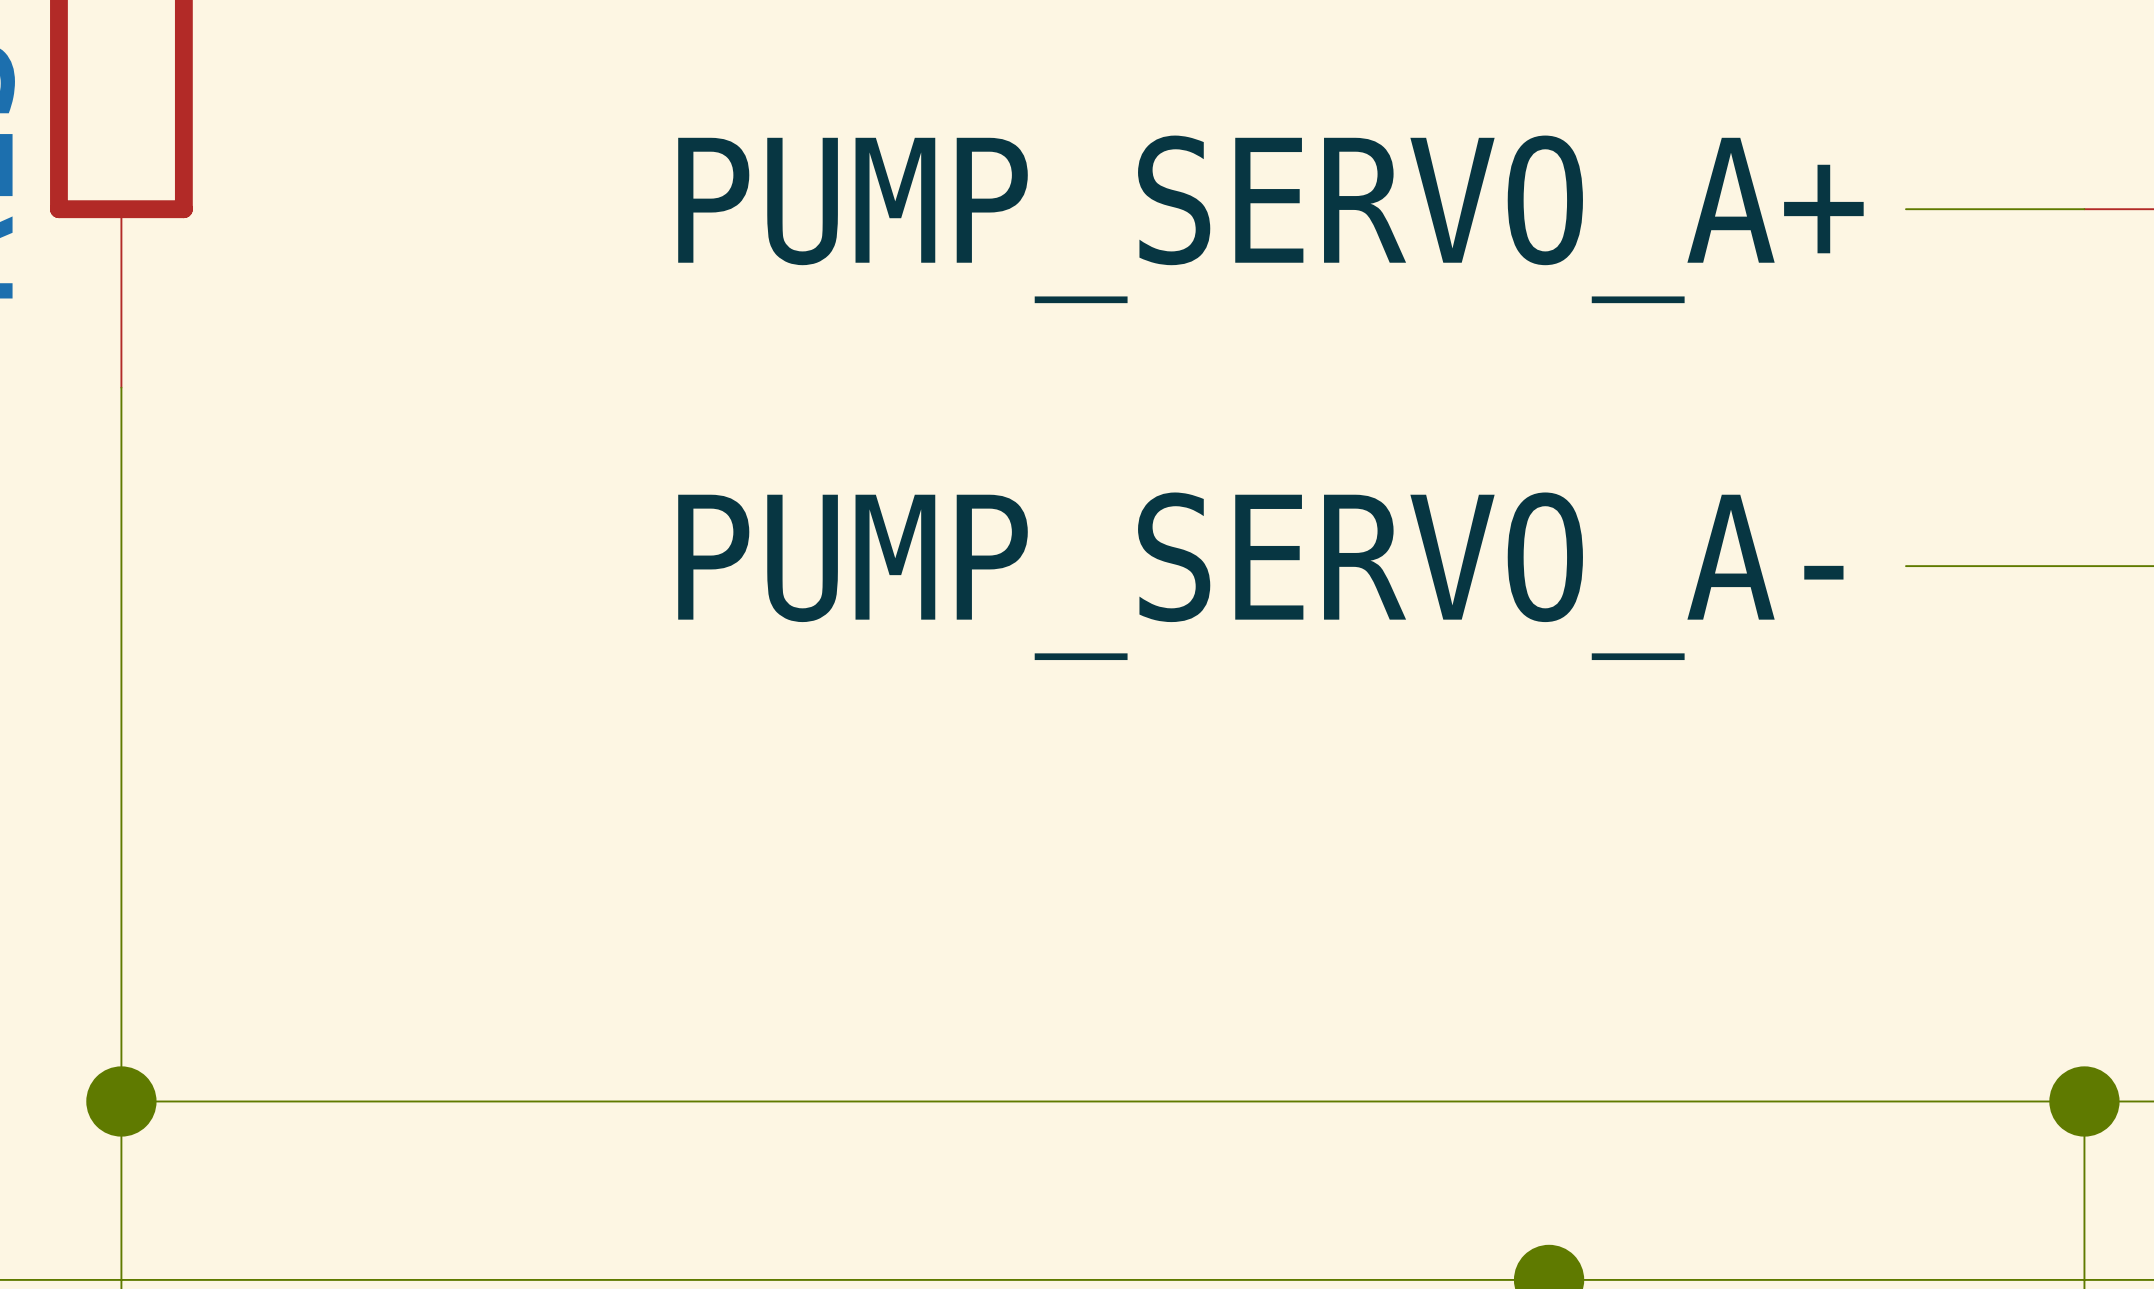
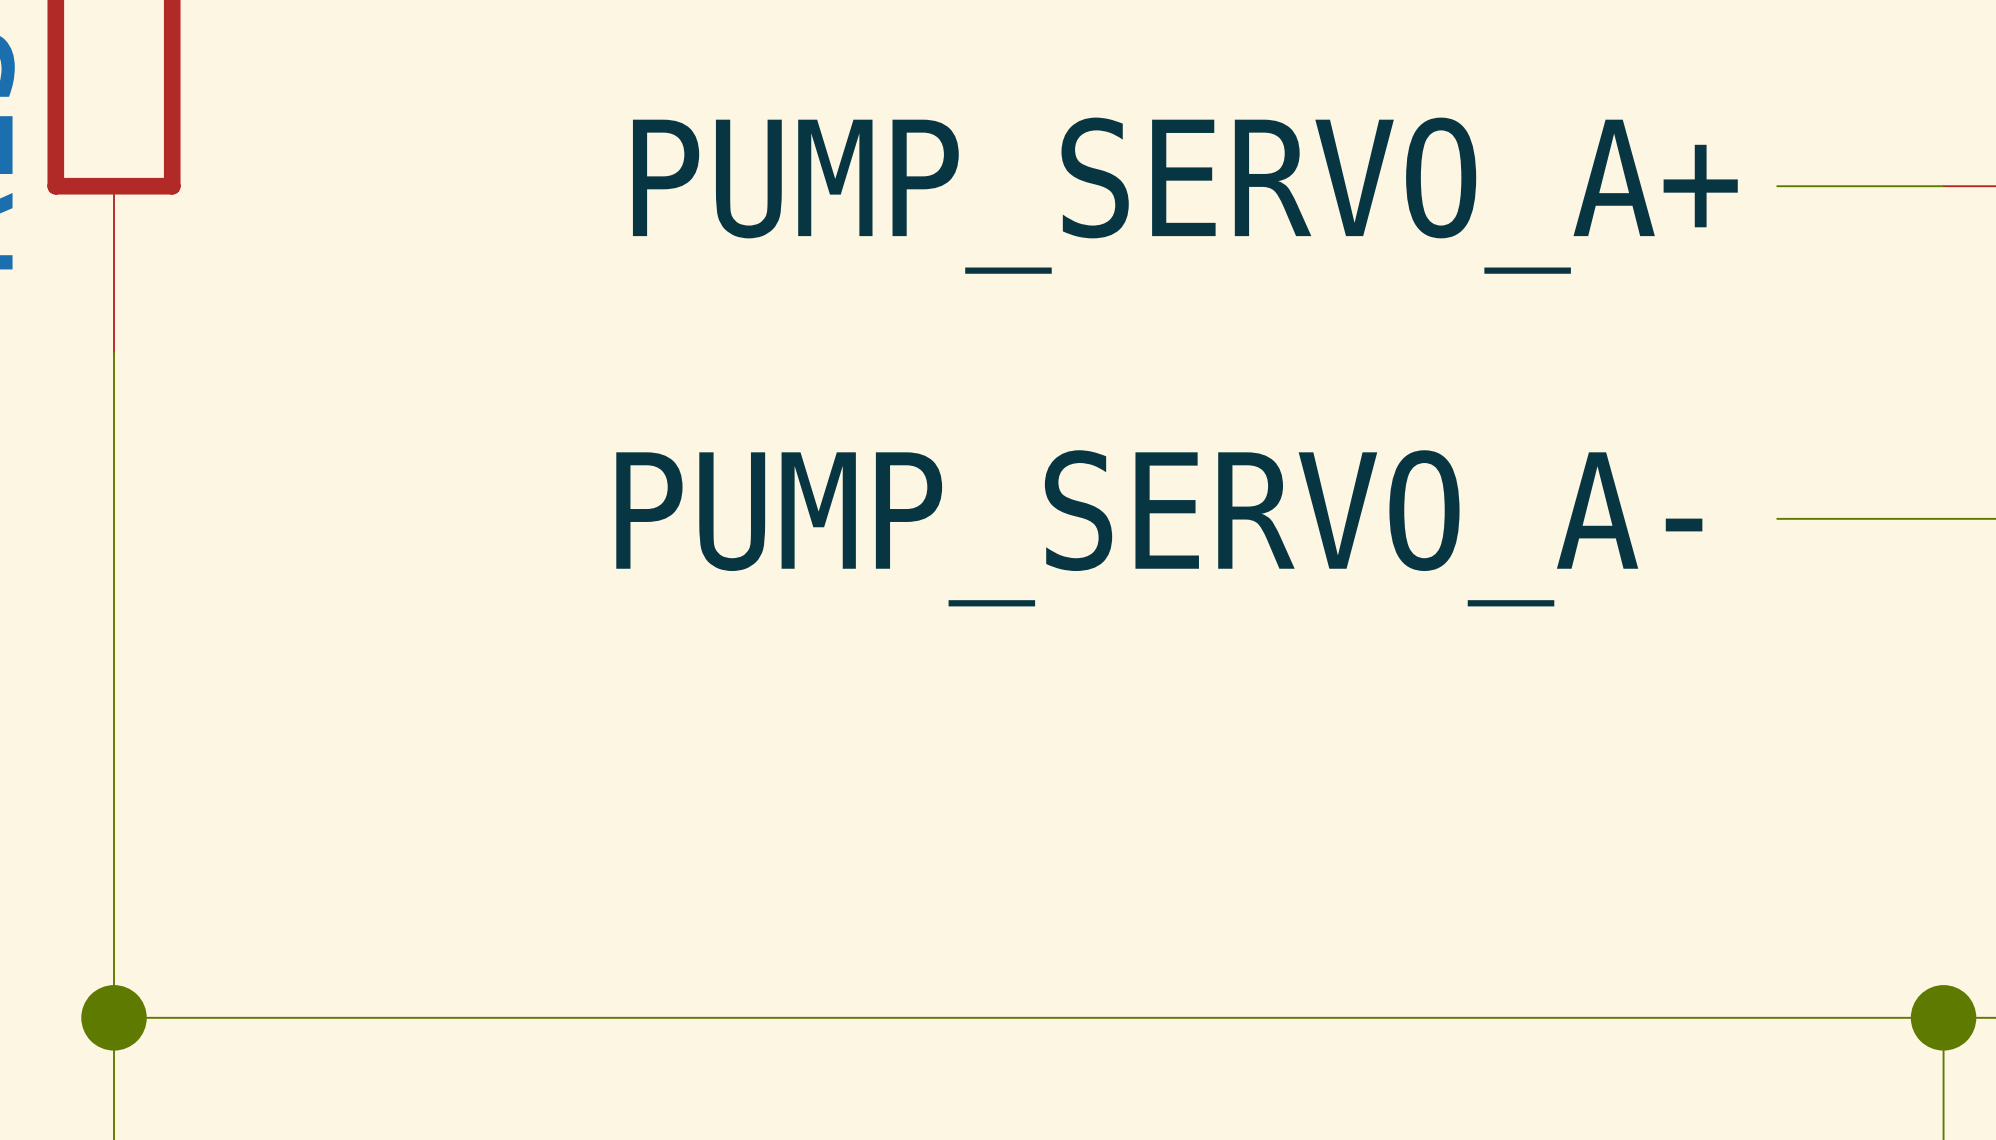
label position: PUMP_SERVO_A- (1260, 576) -> PUMP_SERVO_A- (1159, 528)

